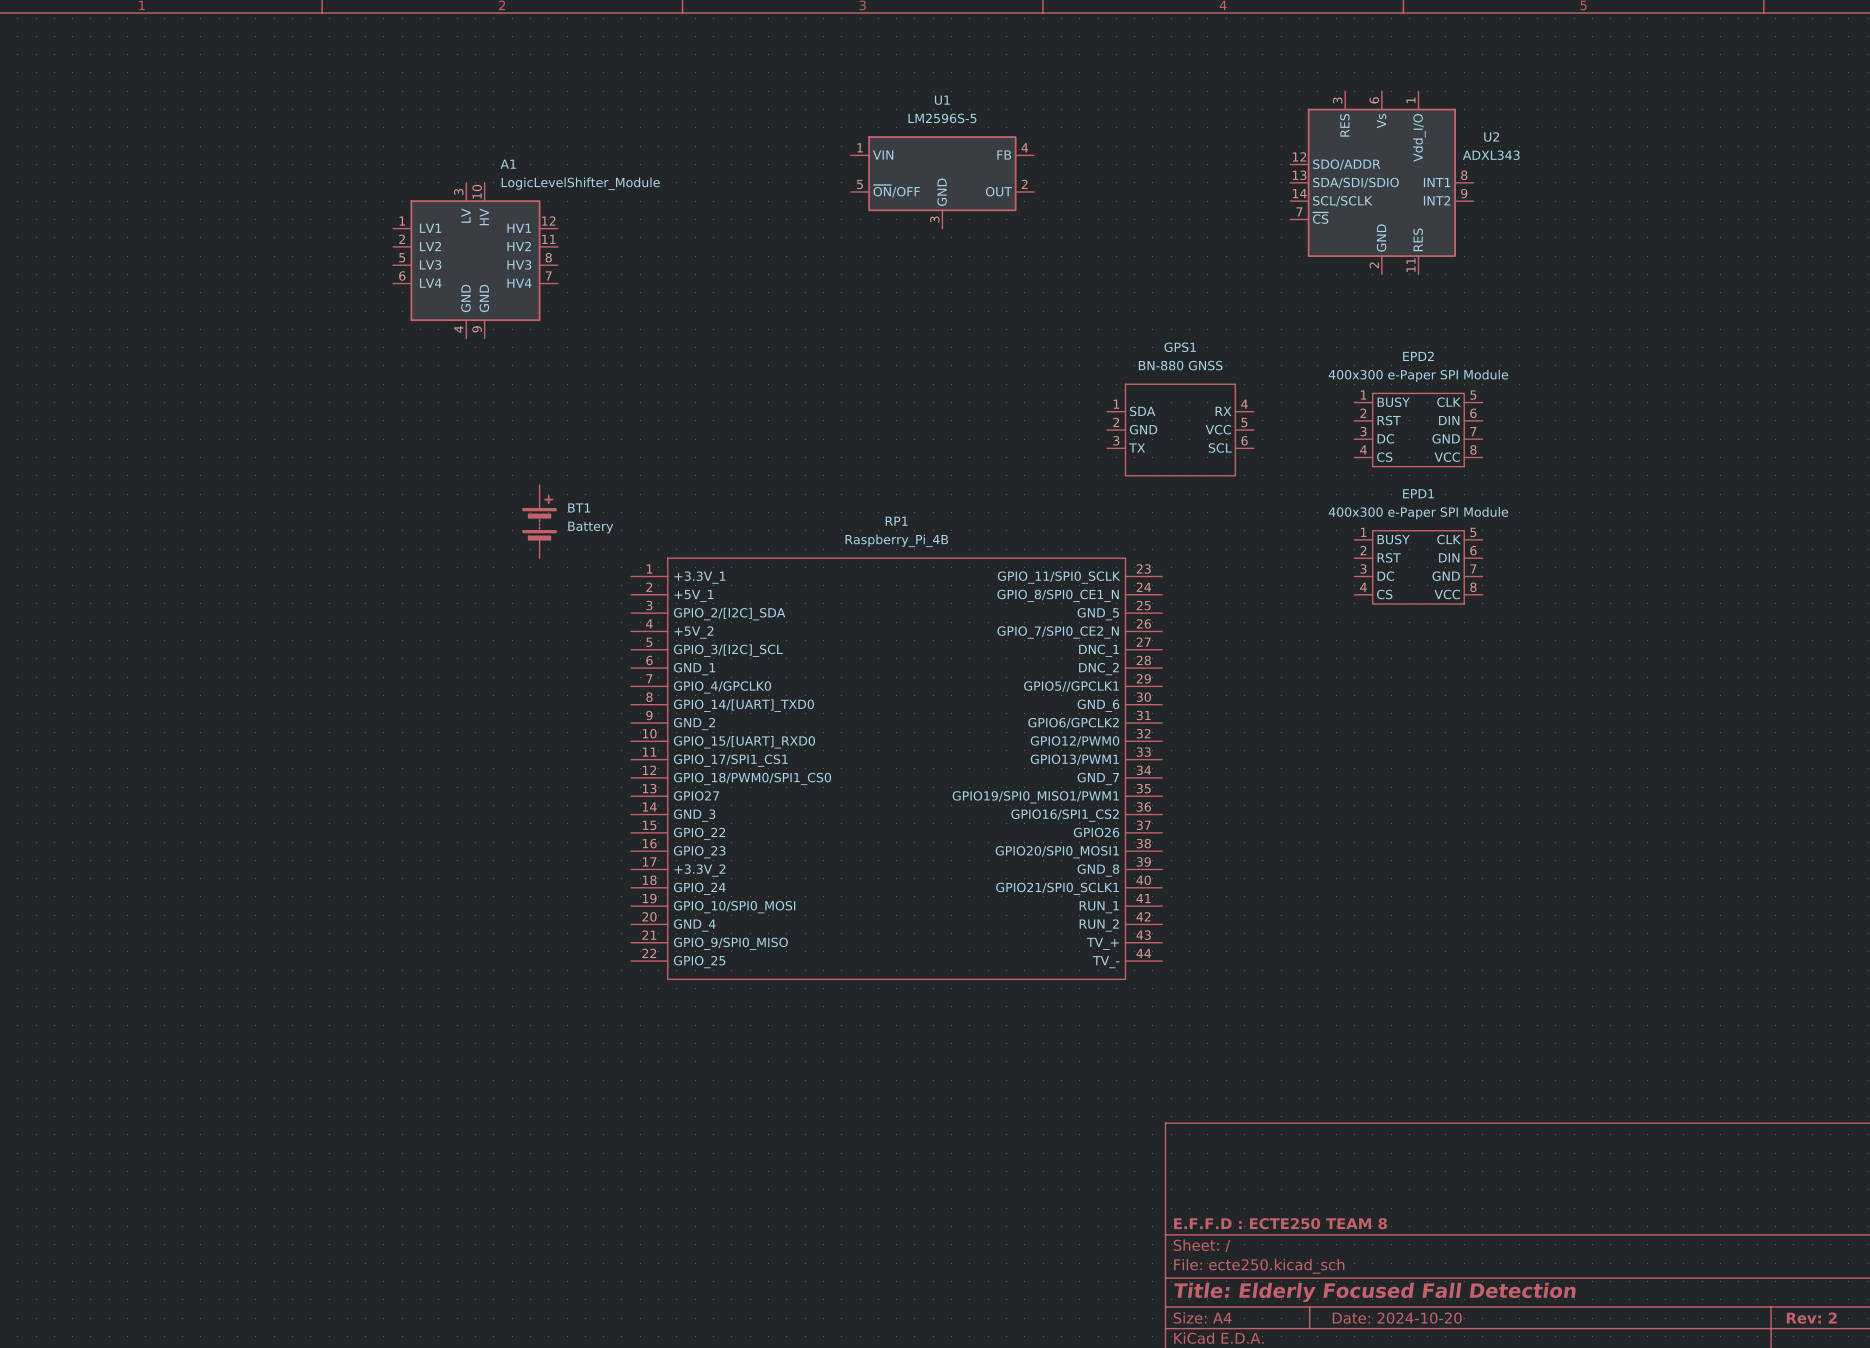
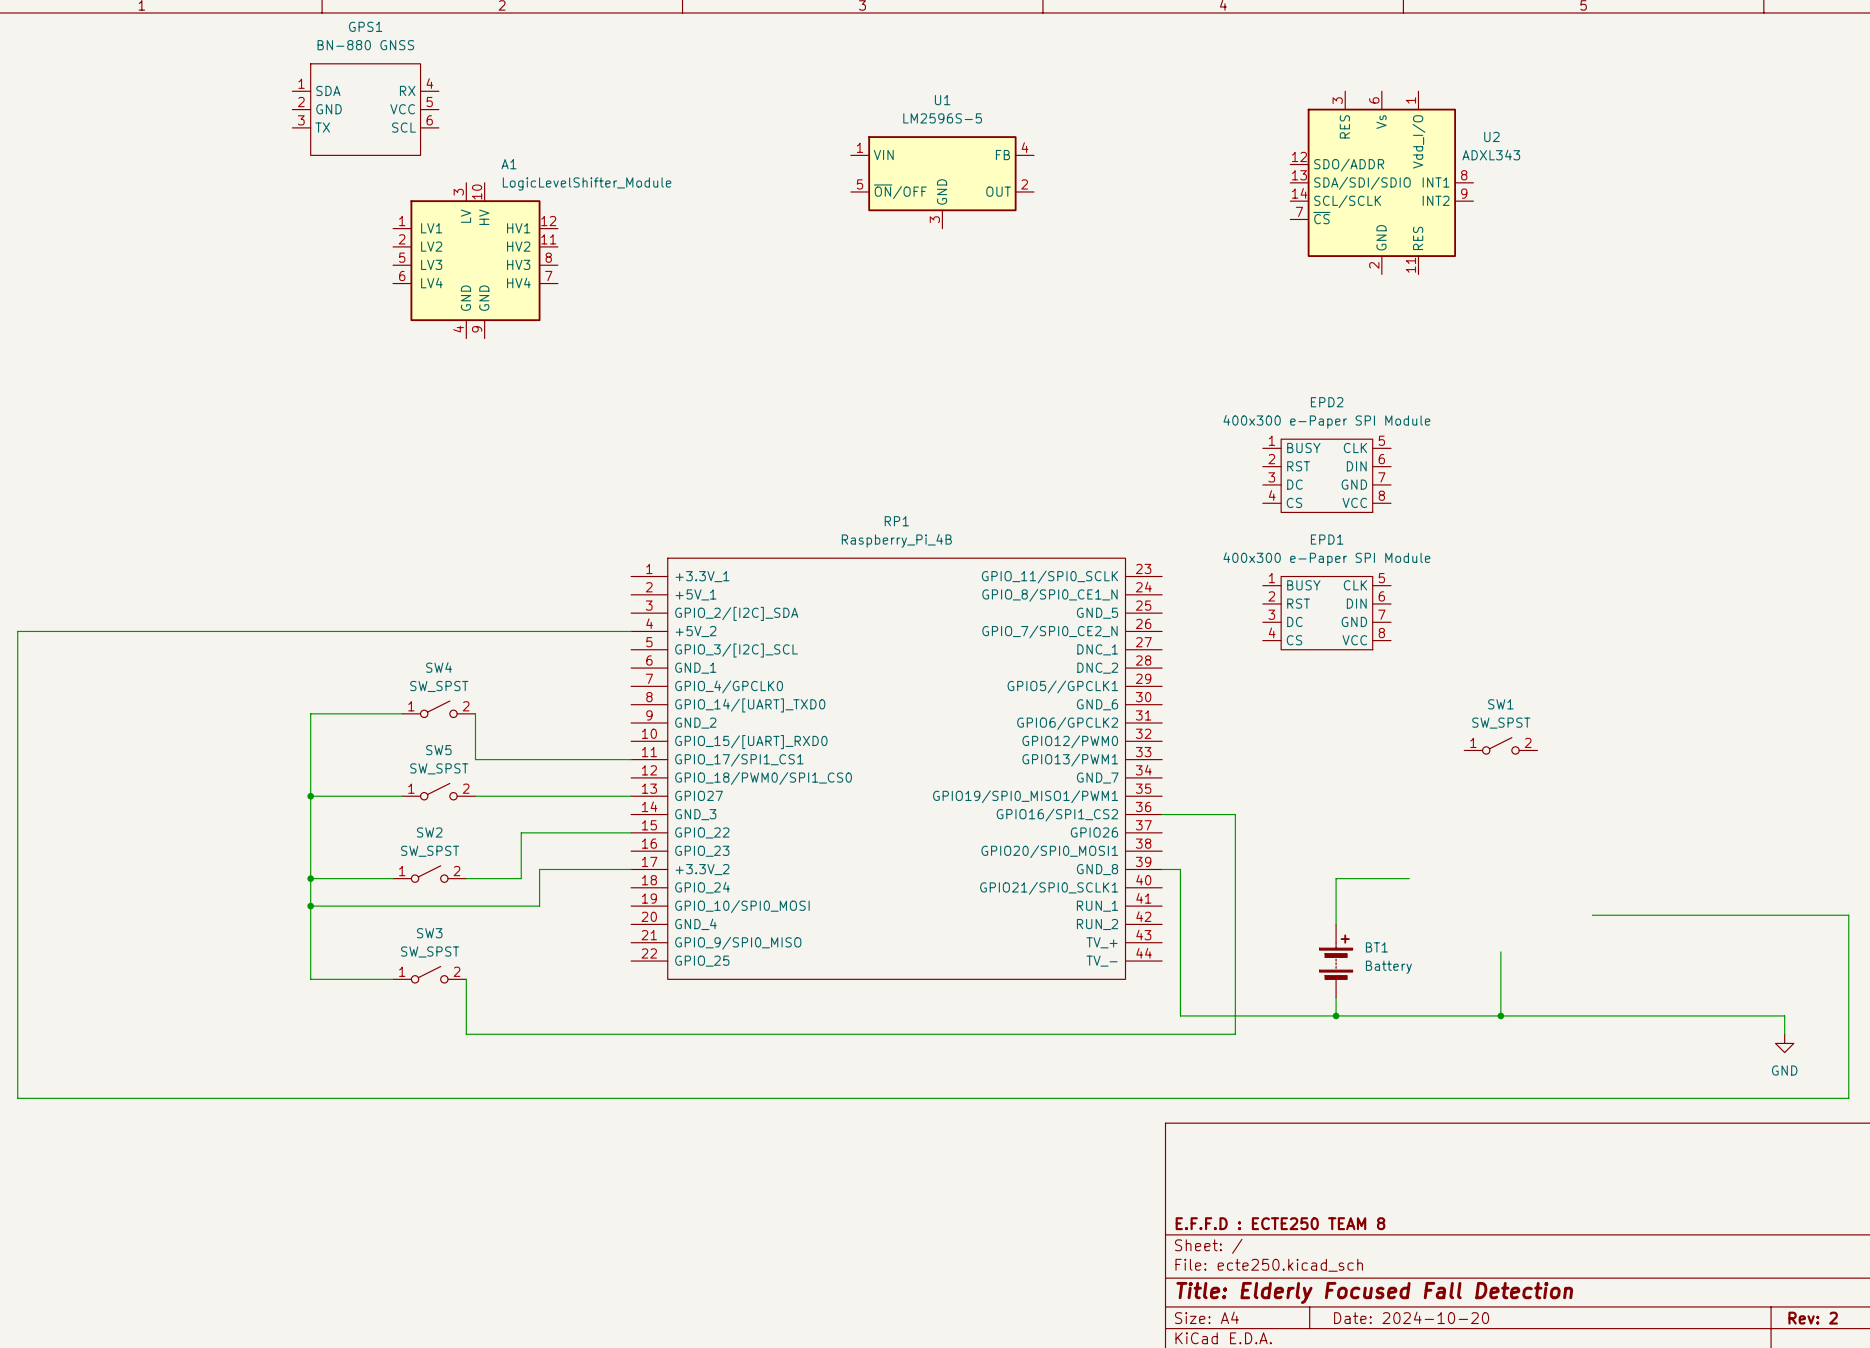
GPS1 position: (1180, 430) -> (365, 109)
EPD2 position: (1418, 430) -> (1326, 475)
BT1 position: (539, 521) -> (1336, 961)
EPD1 position: (1418, 567) -> (1326, 613)
wire: none -> (631, 631) (17, 631) (17, 1098) (1848, 1098) (1848, 915) (1592, 915)
SW4: none -> SW_SPST (438, 709)
wire: none -> (402, 713) (310, 713) (310, 979) (393, 979)
wire: none -> (475, 713) (475, 759) (631, 759)
SW1: none -> SW_SPST (1500, 745)
SW5: none -> SW_SPST (438, 791)
wire: none -> (310, 796) (402, 796)
junction: none -> (310, 796)
wire: none -> (475, 796) (631, 796)
wire: none -> (1162, 814) (1235, 814) (1235, 1034) (466, 1034) (466, 979)
wire: none -> (631, 832) (521, 832) (521, 878) (466, 878)
wire: none -> (631, 869) (539, 869) (539, 906) (310, 906)
wire: none -> (1162, 869) (1180, 869) (1180, 1015) (1784, 1015) (1784, 1034)
SW2: none -> SW_SPST (429, 874)
wire: none -> (310, 878) (393, 878)
junction: none -> (310, 878)
wire: none -> (1409, 878) (1336, 878) (1336, 924)
junction: none -> (310, 906)
wire: none -> (1500, 951) (1500, 1015)
SW3: none -> SW_SPST (429, 974)
wire: none -> (1336, 997) (1336, 1015)
junction: none -> (1336, 1015)
junction: none -> (1500, 1015)
power symbol: none -> GND (1784, 1043)

